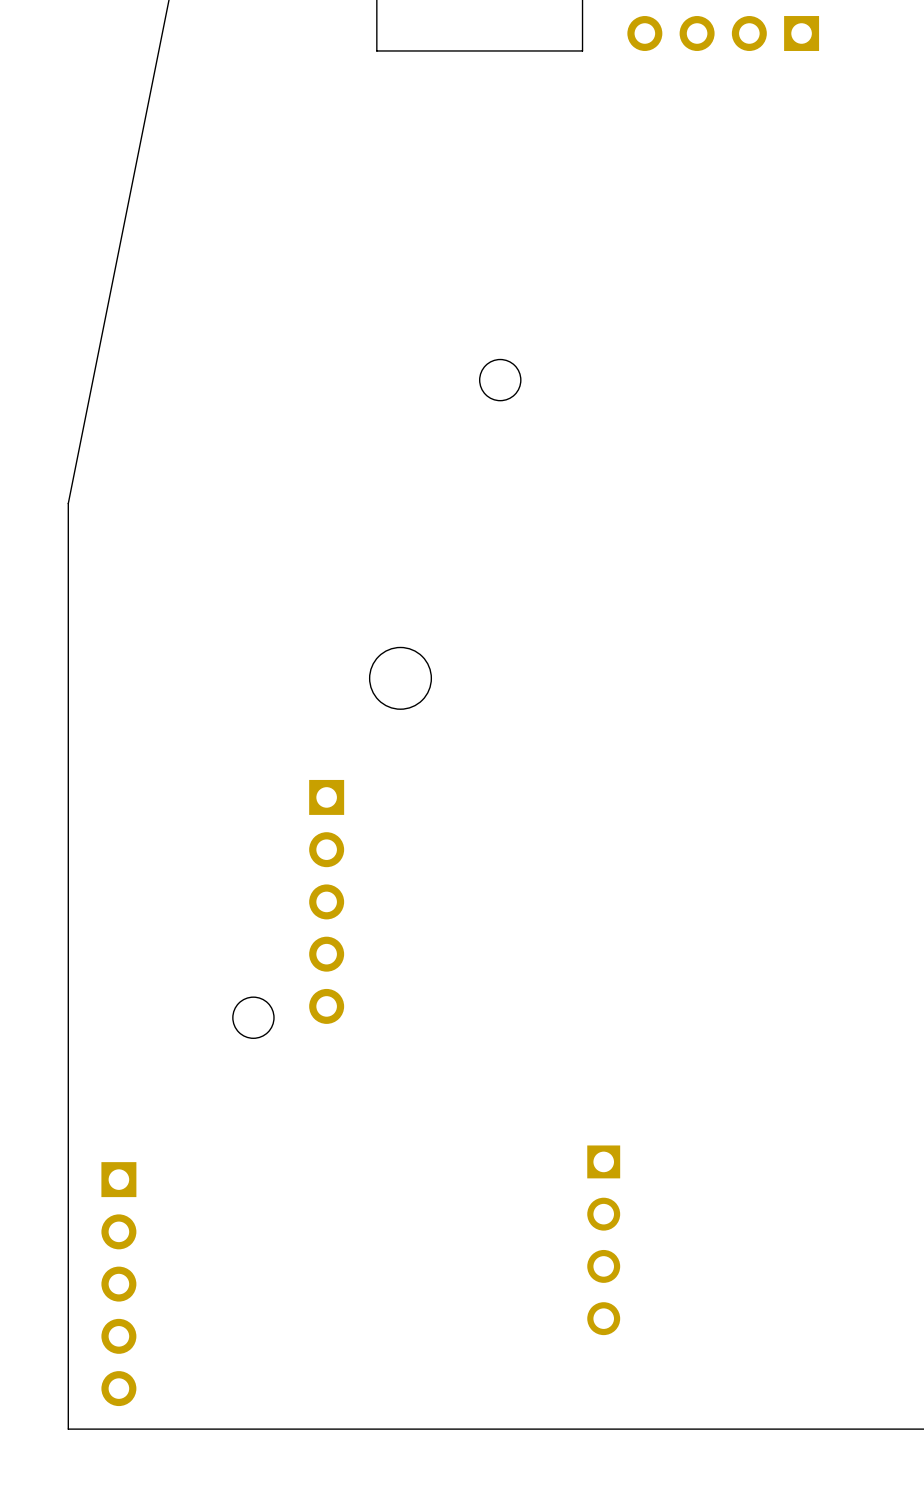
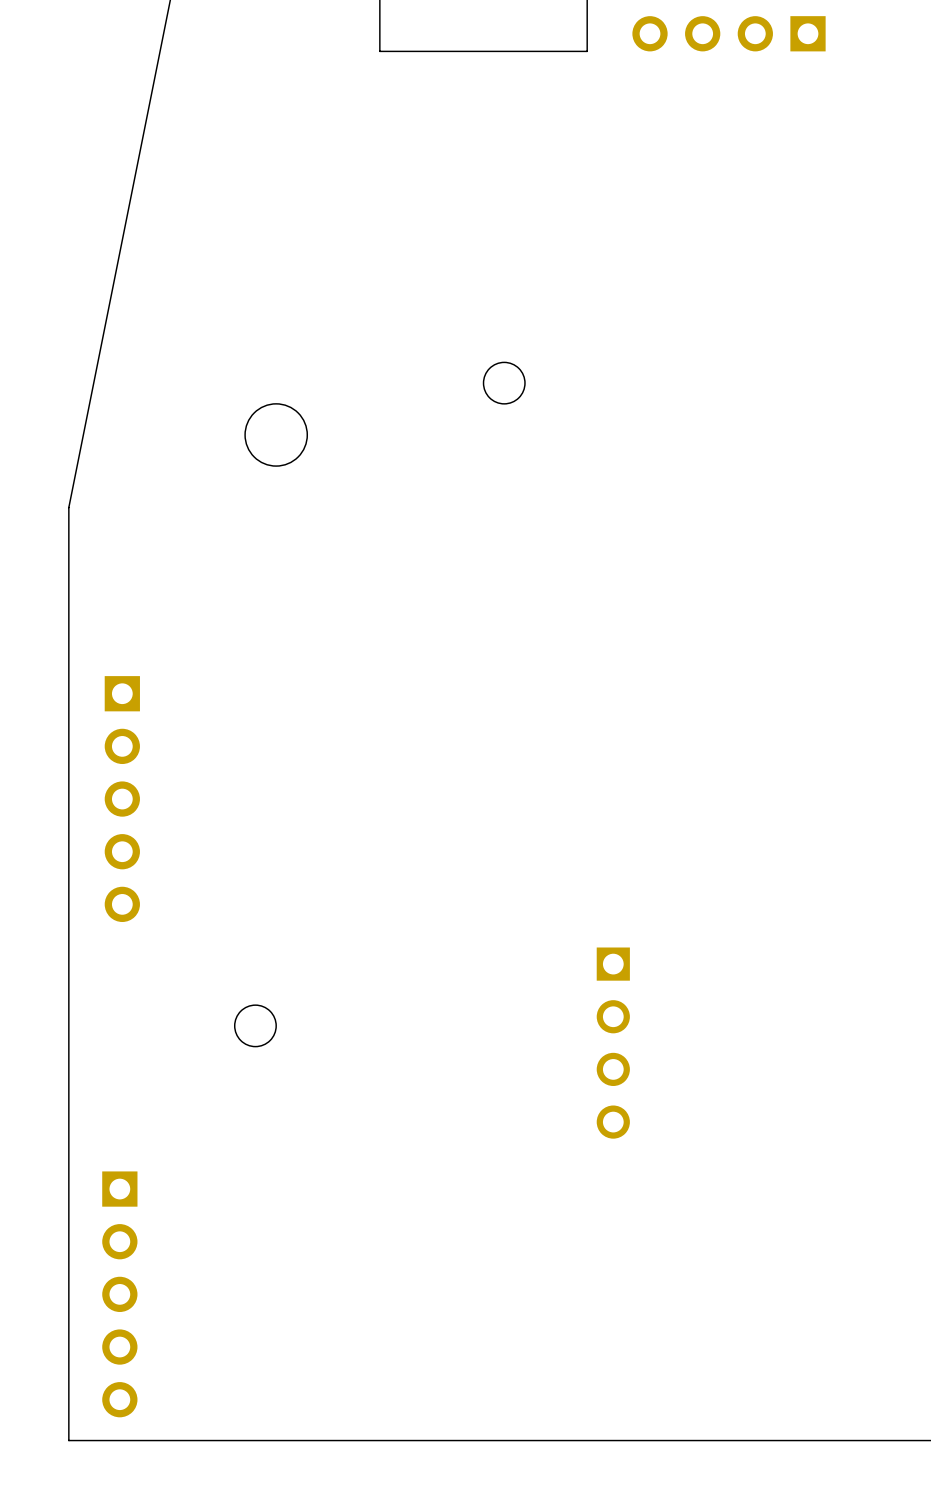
round board edge position: (400, 678) -> (276, 434)
part position: (326, 901) -> (122, 799)
part: none -> (613, 1043)
part: (603, 1240) -> none

